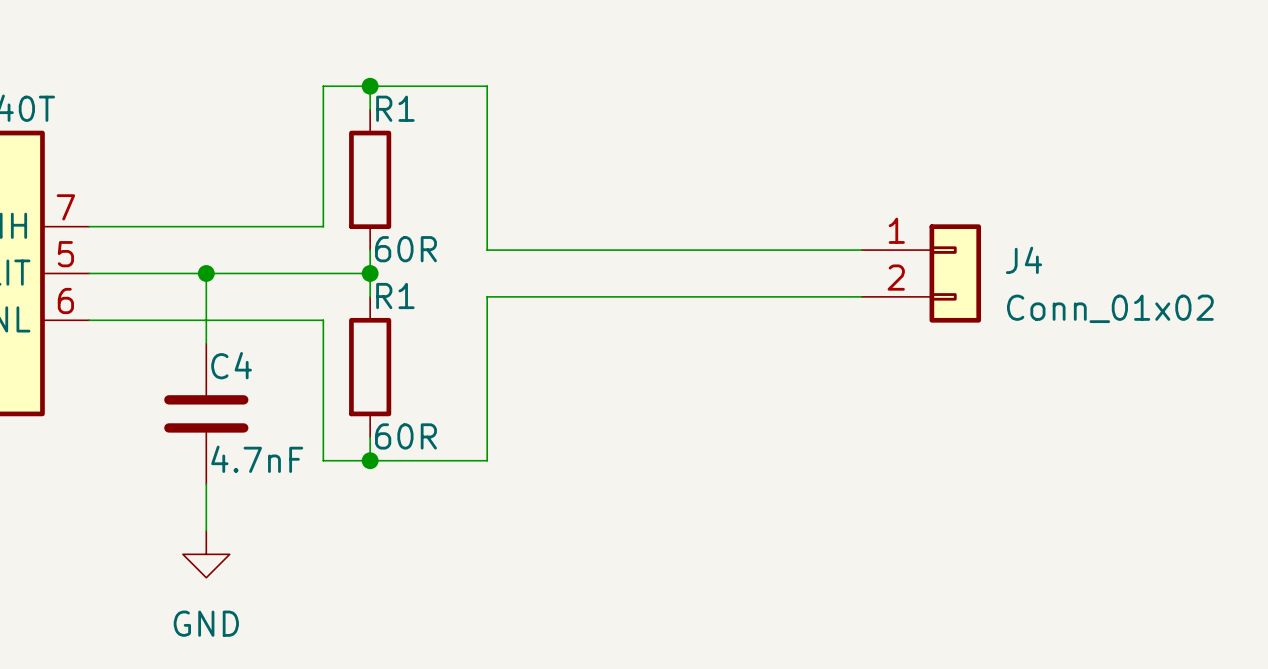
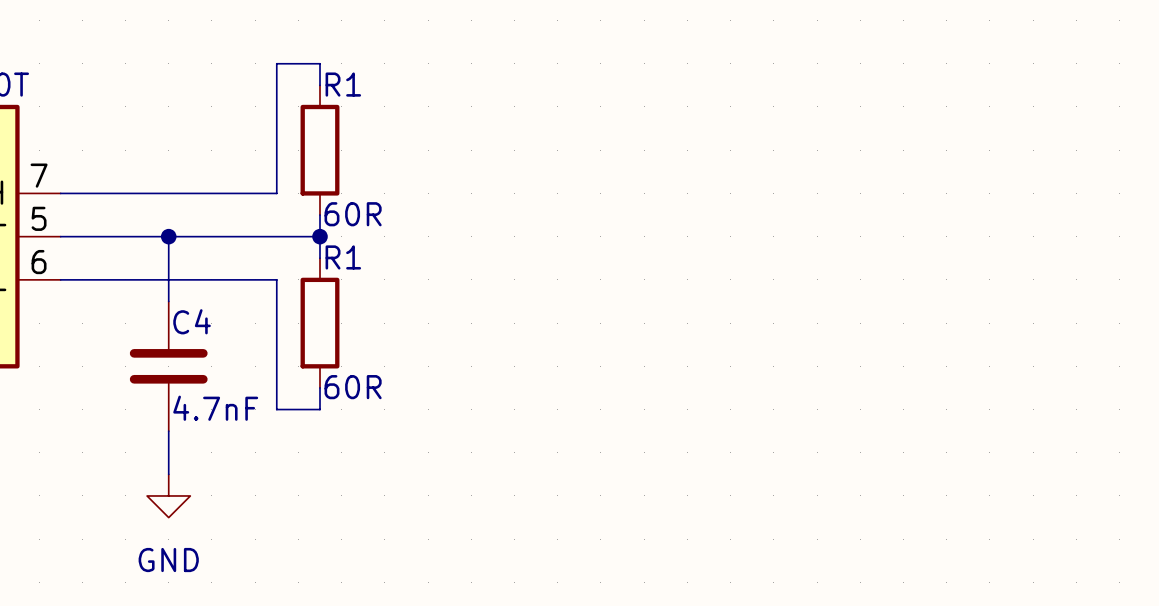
wire: (370, 86) (487, 86) (487, 250) (861, 250) -> none
junction: (370, 86) -> none
J4: Conn_01x02 (921, 273) -> none
wire: (861, 296) (487, 296) (487, 460) (370, 460) -> none
junction: (370, 460) -> none

